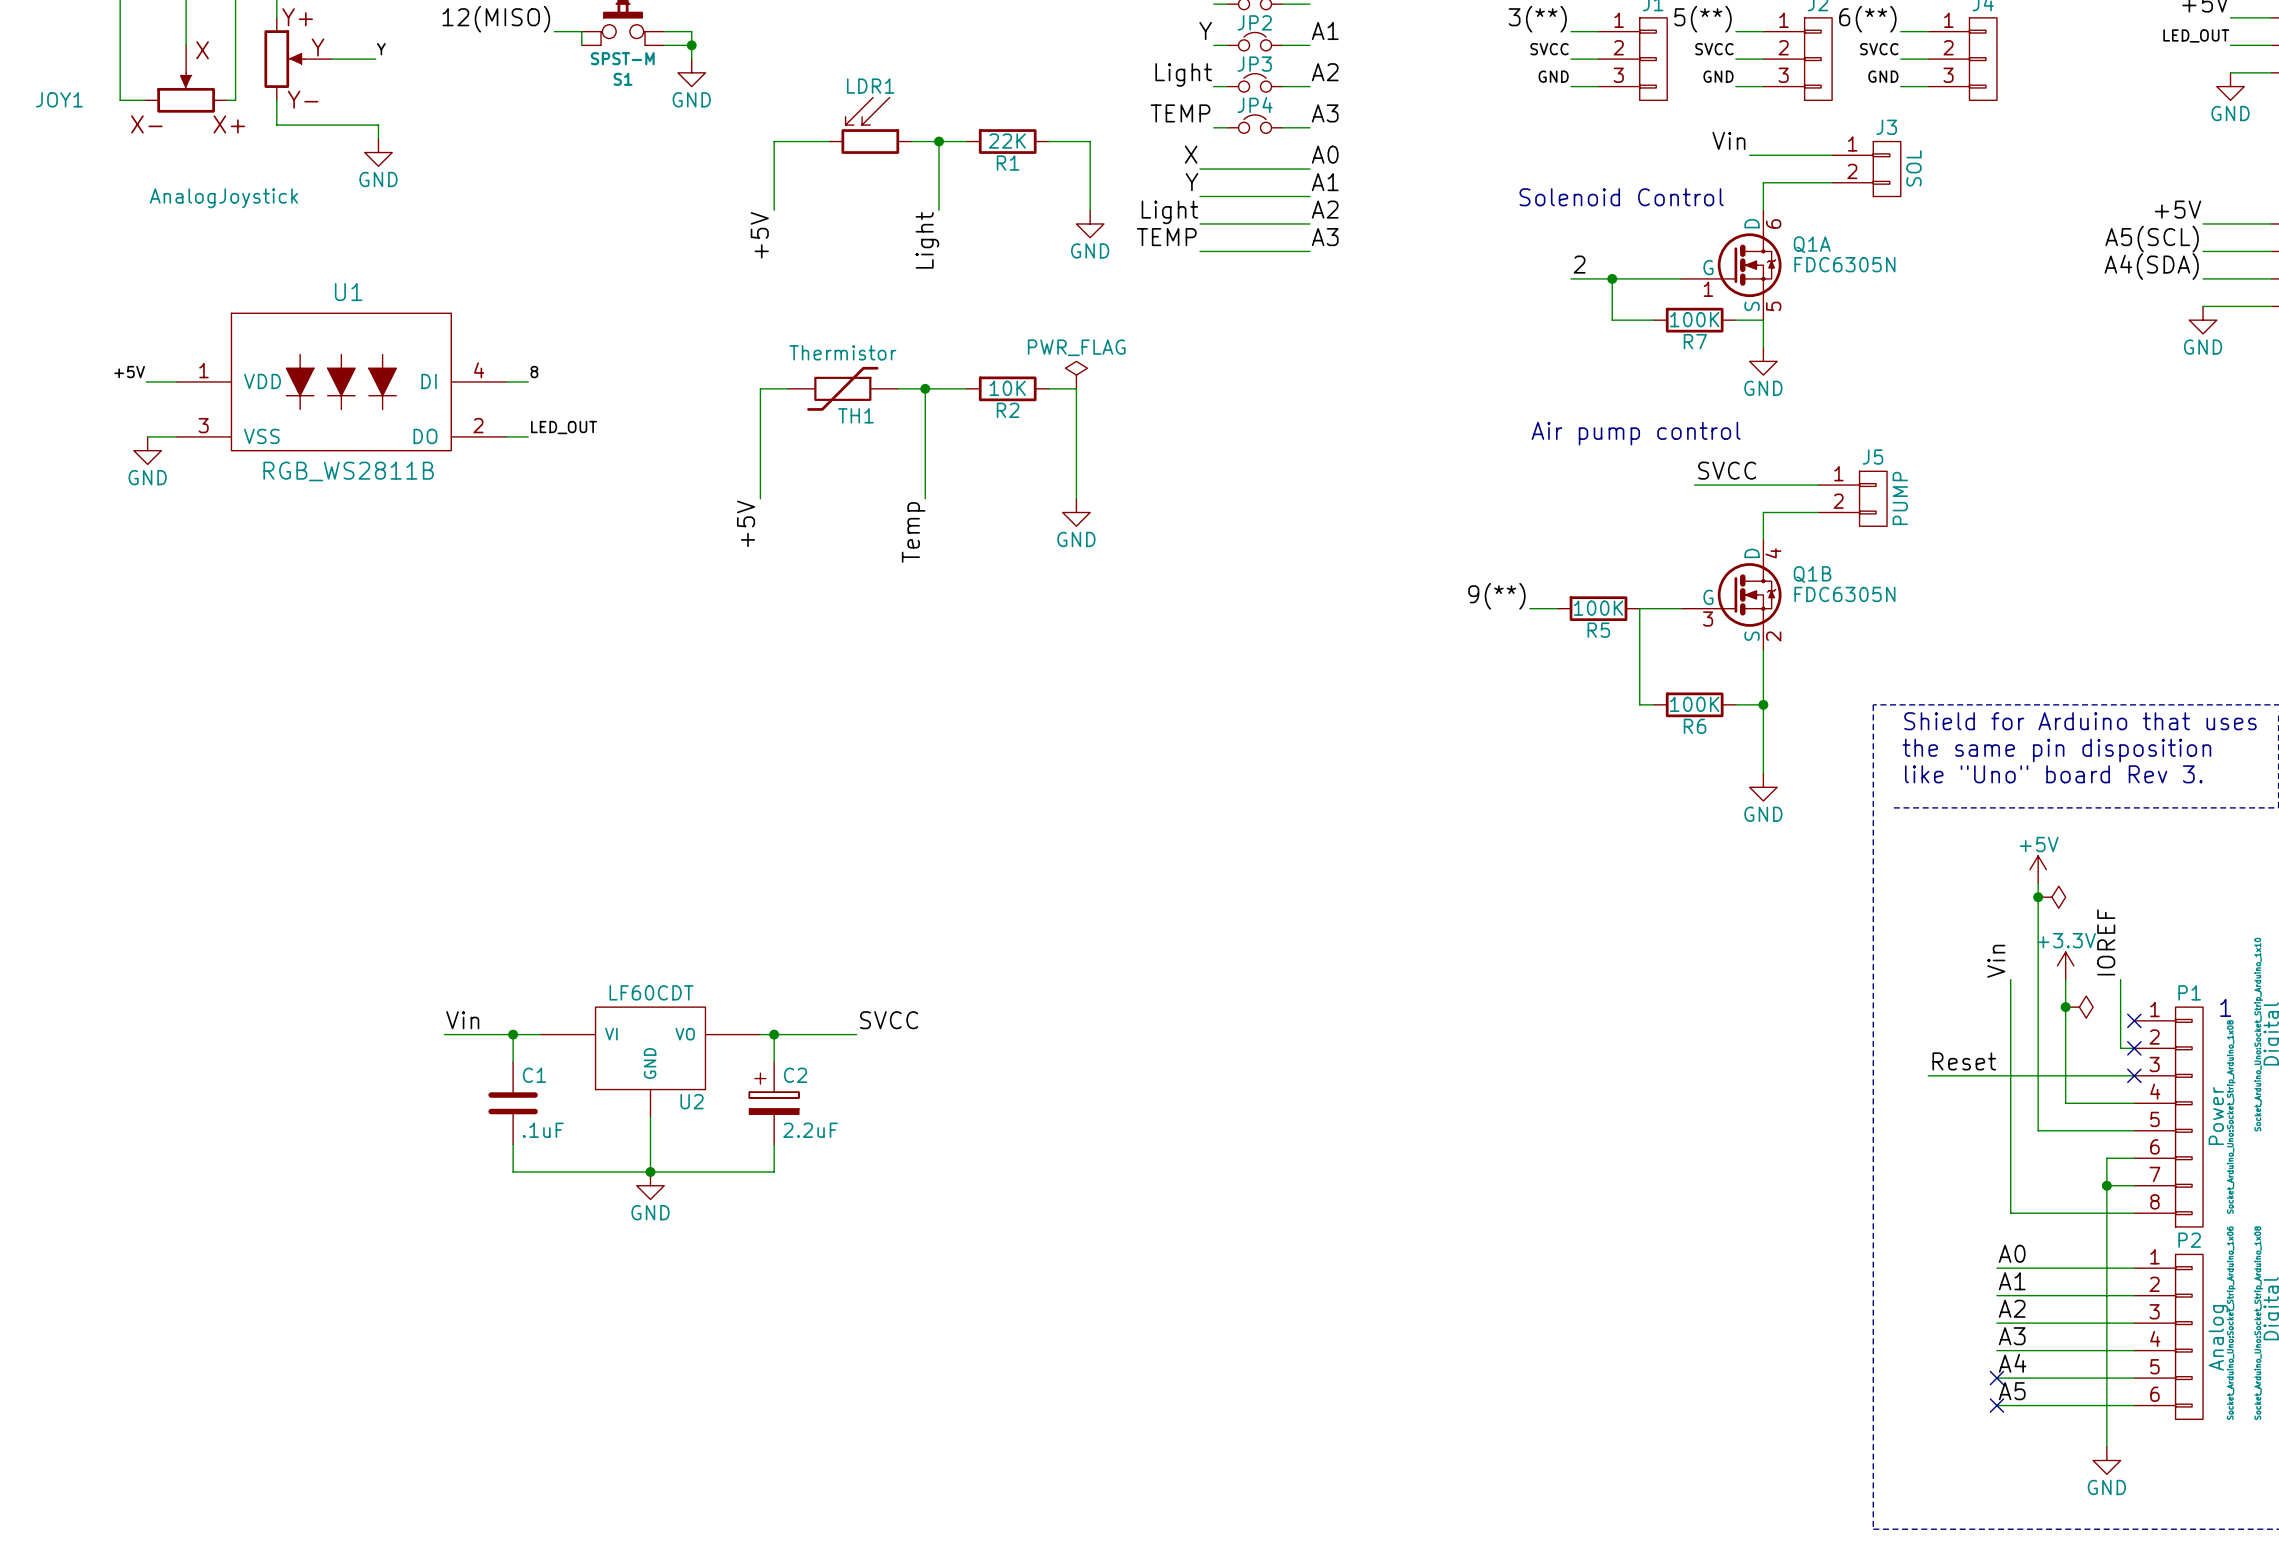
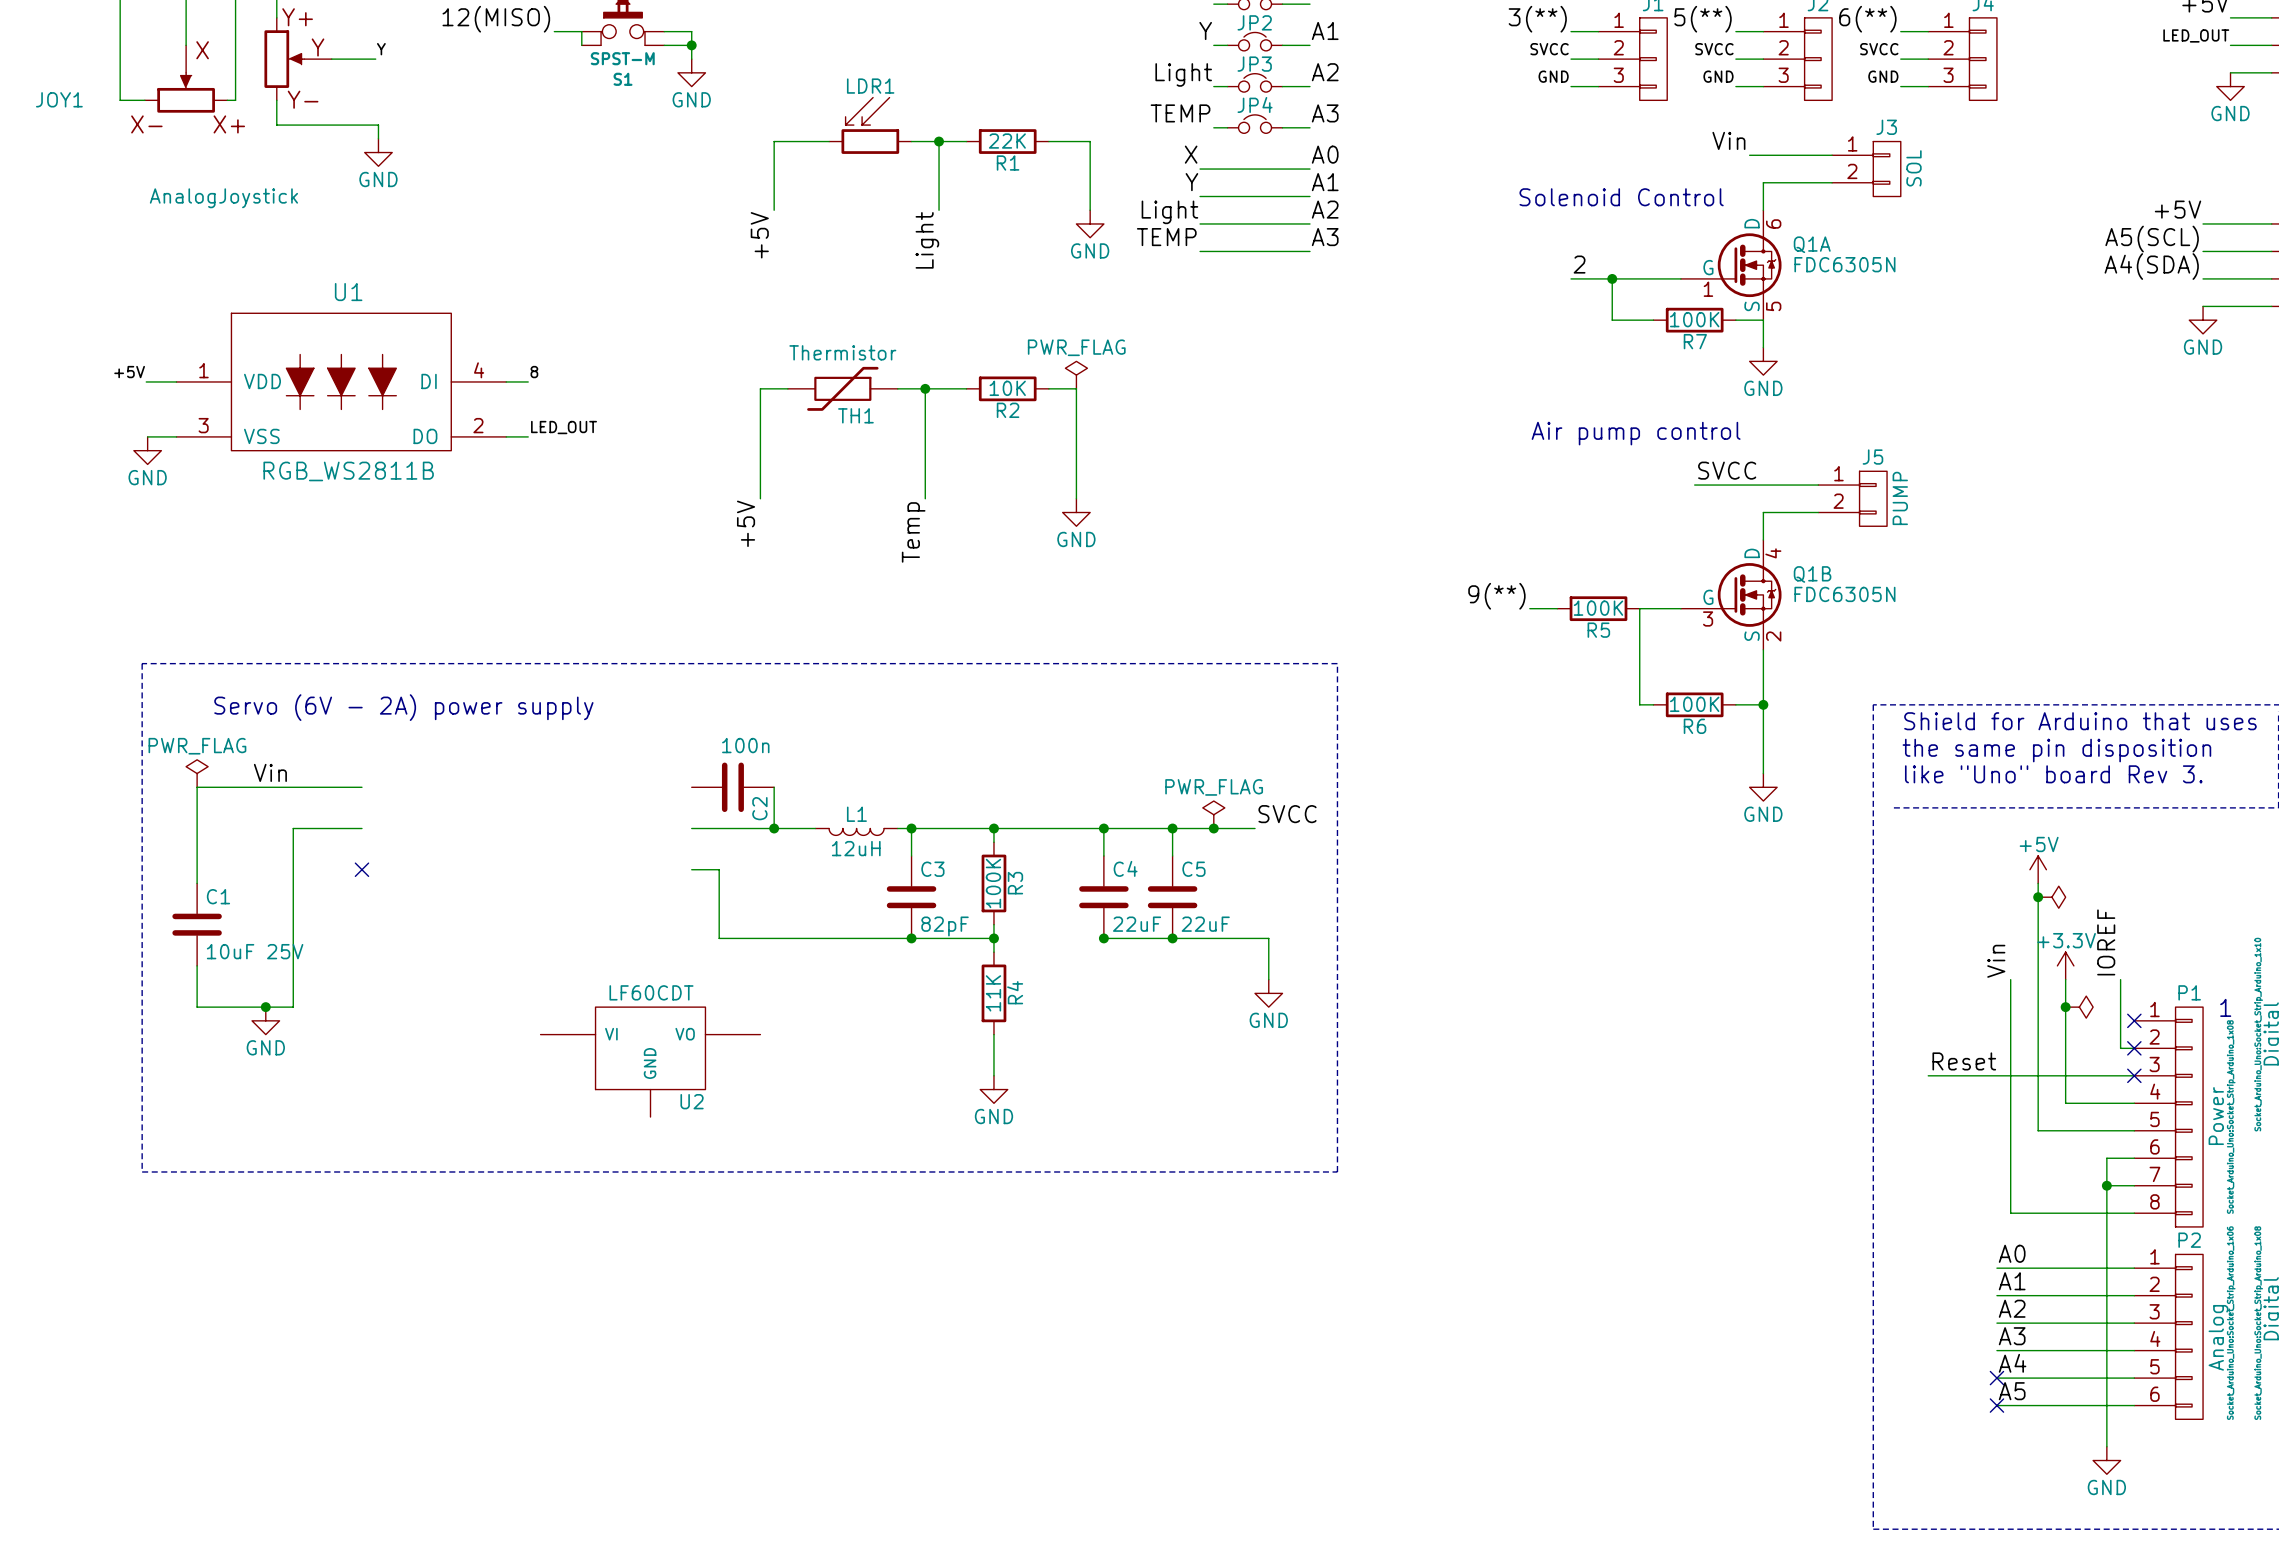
line: none -> (142, 663) (142, 1171) (1337, 1171) (1337, 663) (142, 663)
text: none -> Servo (6V - 2A) power supply (403, 707)
label: none -> Vin (270, 772)
power symbol: none -> PWR_FLAG (197, 773)
wire: none -> (361, 787) (197, 787) (197, 883)
wire: none -> (774, 787) (774, 828)
power symbol: none -> PWR_FLAG (1213, 814)
label: none -> SVCC (1287, 814)
wire: none -> (361, 828) (293, 828) (293, 1007) (197, 1007) (197, 965)
wire: none -> (691, 828) (815, 828)
junction: none -> (774, 828)
wire: none -> (897, 828) (1255, 828)
wire: none -> (911, 828) (911, 855)
junction: none -> (911, 828)
wire: none -> (993, 828) (993, 842)
junction: none -> (993, 828)
wire: none -> (1103, 828) (1103, 855)
junction: none -> (1103, 828)
wire: none -> (1172, 828) (1172, 855)
junction: none -> (1172, 828)
junction: none -> (1213, 828)
L1: none -> 12uH (856, 831)
no-connect mark: none -> (361, 869)
wire: none -> (691, 869) (719, 869) (719, 938) (993, 938)
R3: none -> 100K (993, 883)
C3: none -> 82pF (911, 897)
C4: none -> 22uF (1103, 897)
C5: none -> 22uF (1172, 897)
junction: none -> (911, 938)
junction: none -> (993, 938)
wire: none -> (1103, 938) (1268, 938) (1268, 979)
junction: none -> (1103, 938)
junction: none -> (1172, 938)
R4: none -> 11K (993, 993)
power symbol: none -> GND (1268, 993)
junction: none -> (265, 1007)
power symbol: none -> GND (265, 1020)
label: Vin (462, 1020) -> none
label: SVCC (889, 1020) -> none
wire: (444, 1034) (540, 1034) -> none
wire: (513, 1034) (513, 1062) -> none
junction: (513, 1034) -> none
wire: (760, 1034) (856, 1034) -> none
wire: (774, 1034) (774, 1062) -> (993, 924) (993, 952)
junction: (774, 1034) -> none
wire: none -> (993, 1034) (993, 1075)
C2 symbol: [749, 1062, 799, 1145] -> [691, 762, 775, 813]
C2 name position: C2 (795, 1075) -> C2 (759, 808)
power symbol: none -> GND (993, 1089)
C1 position: (513, 1103) -> (197, 924)
wire: (650, 1117) (650, 1171) -> none
C1 value: .1uF (543, 1130) -> 10uF 25V (255, 951)
C2 value: 2.2uF (810, 1130) -> 100n (745, 745)
wire: (513, 1144) (513, 1171) (774, 1171) (774, 1144) -> none
junction: (650, 1171) -> none
power symbol: GND (650, 1185) -> none

